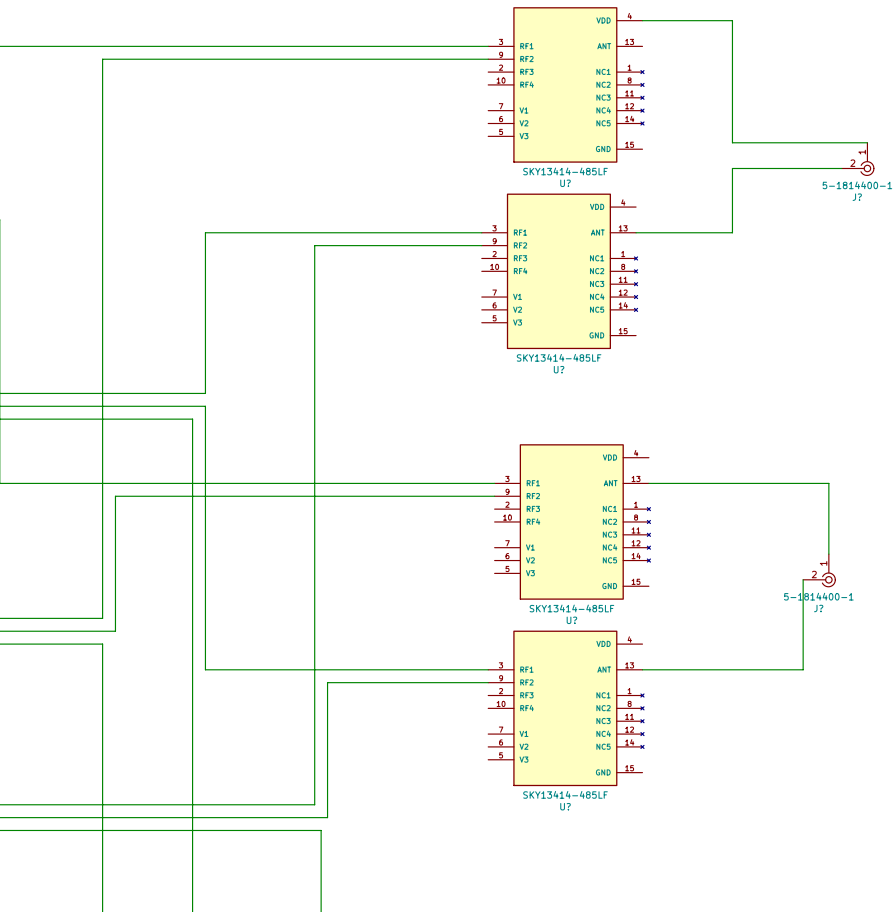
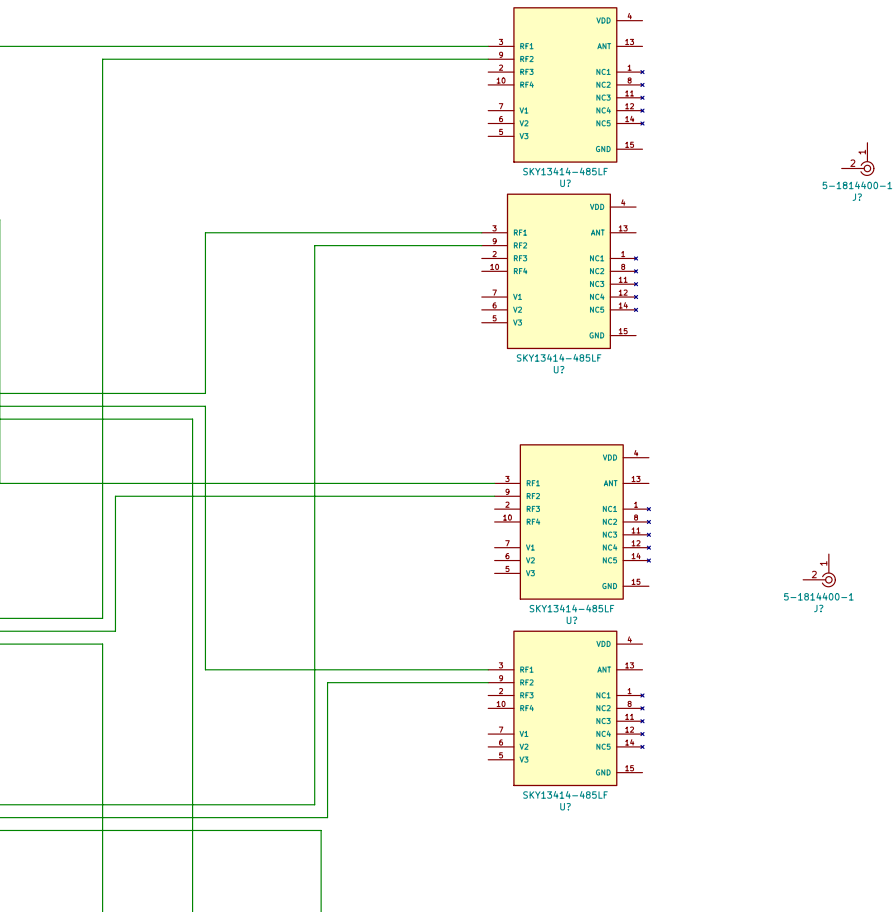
wire: (642, 20) (732, 20) (732, 142) (867, 142) -> none
wire: (841, 168) (732, 168) (732, 232) (636, 232) -> none
wire: (648, 483) (828, 483) (828, 554) -> none
wire: (803, 579) (803, 669) (642, 669) -> none

